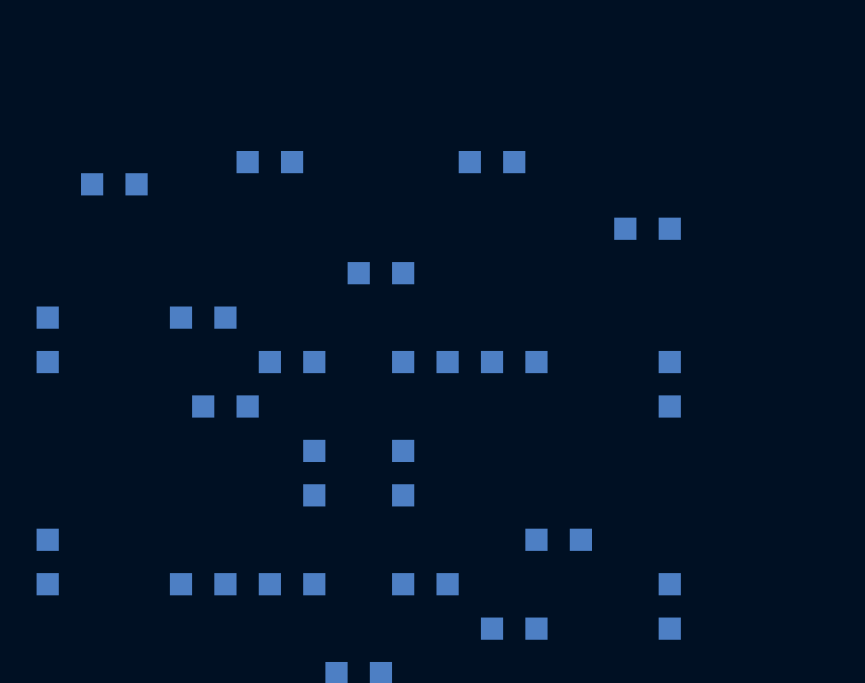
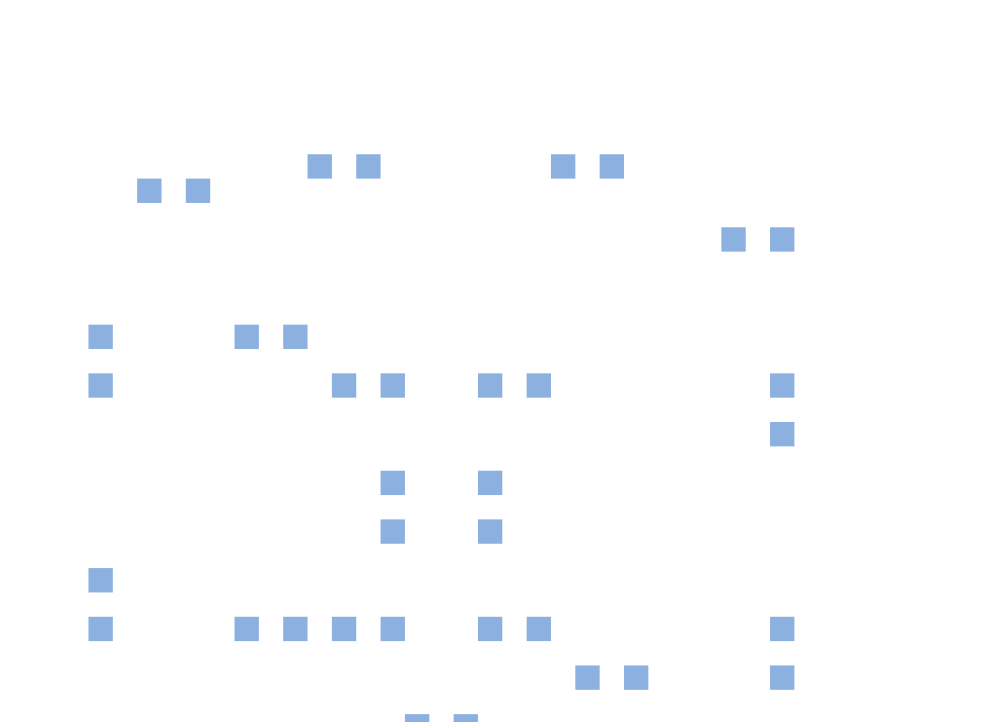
part: (380, 273) -> none
part: (514, 362) -> none
part: (225, 406) -> none
part: (558, 539) -> none

